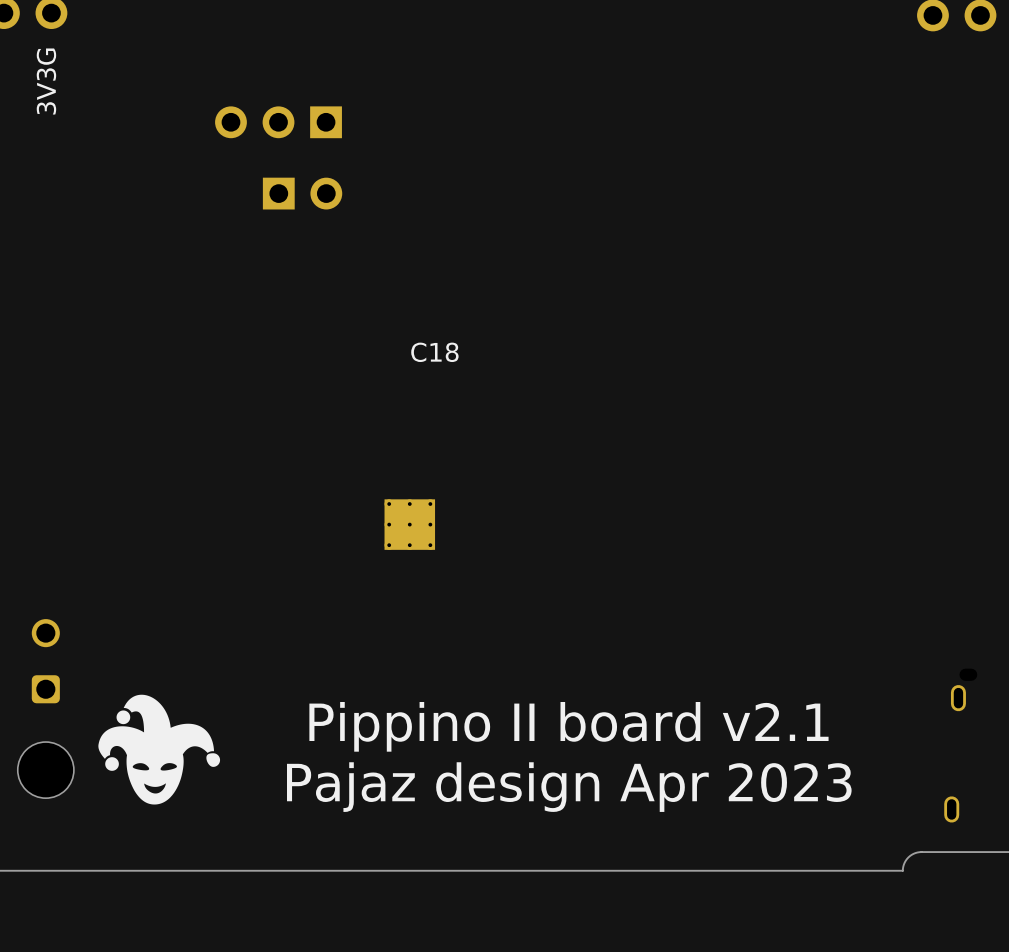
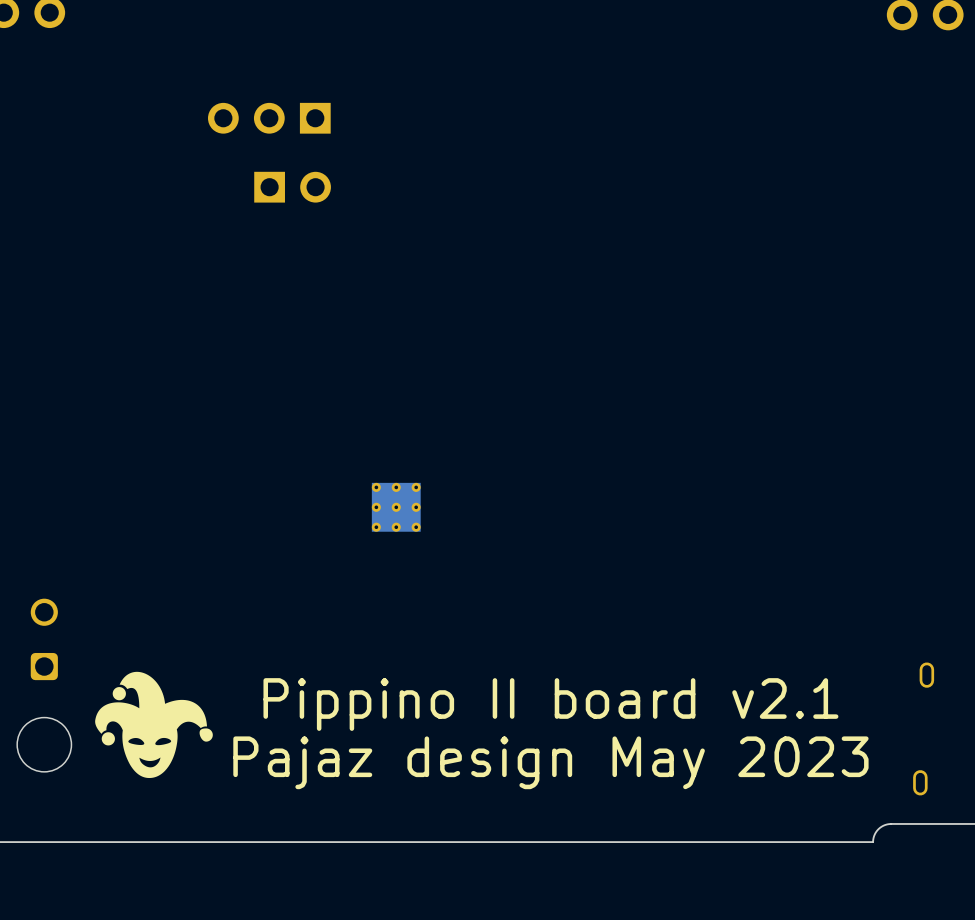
text: 3V3G (46, 81) -> none
C18: (434, 352) -> none
text: Pajaz design Apr 2023 (569, 787) -> Pajaz design May 2023 (550, 762)

